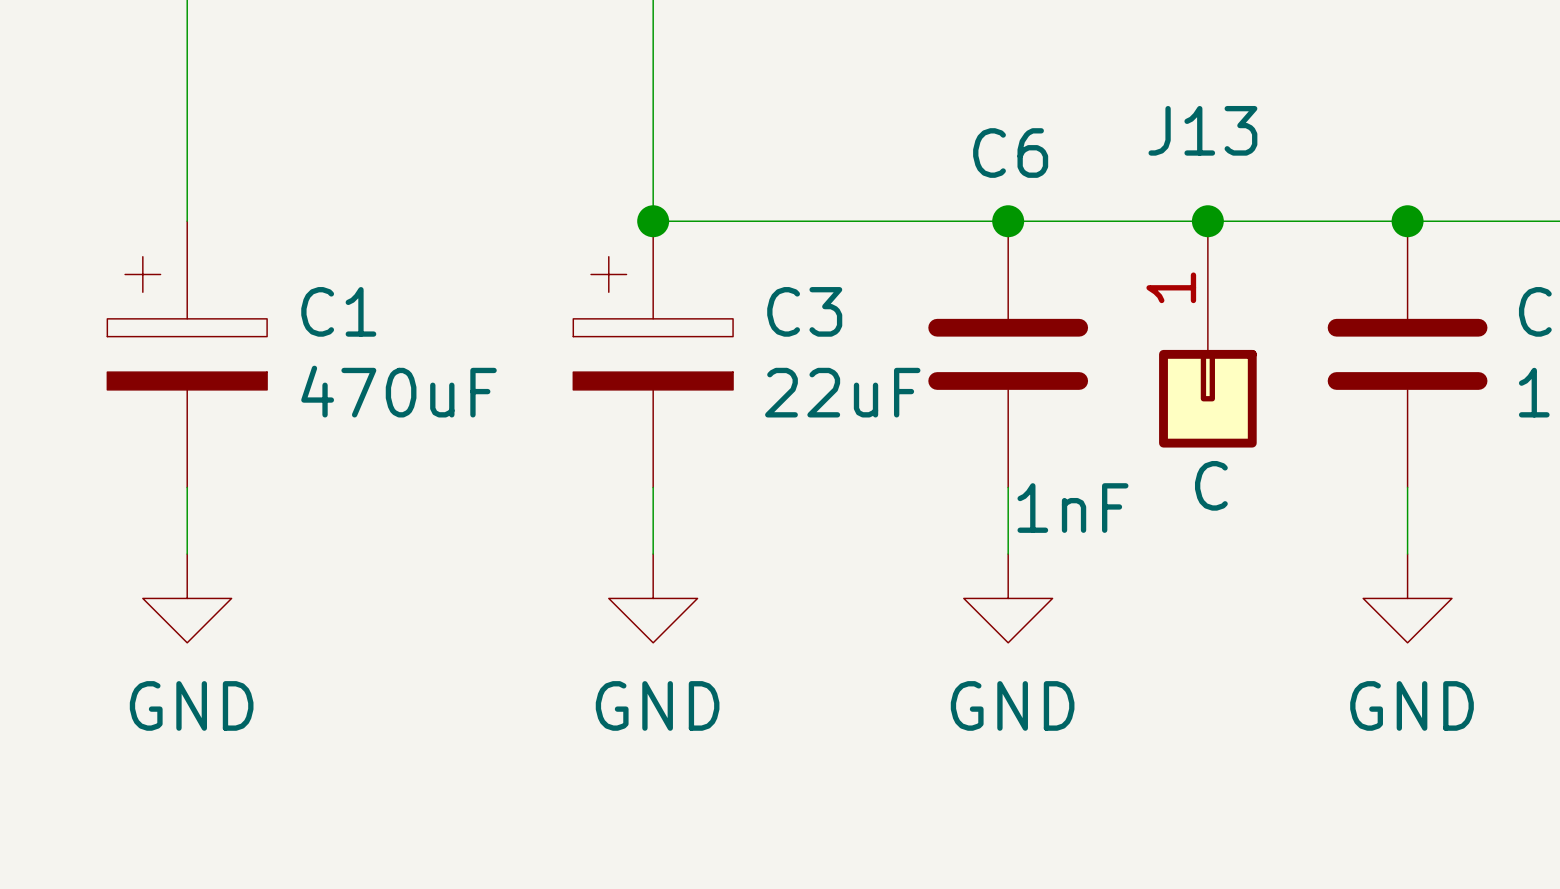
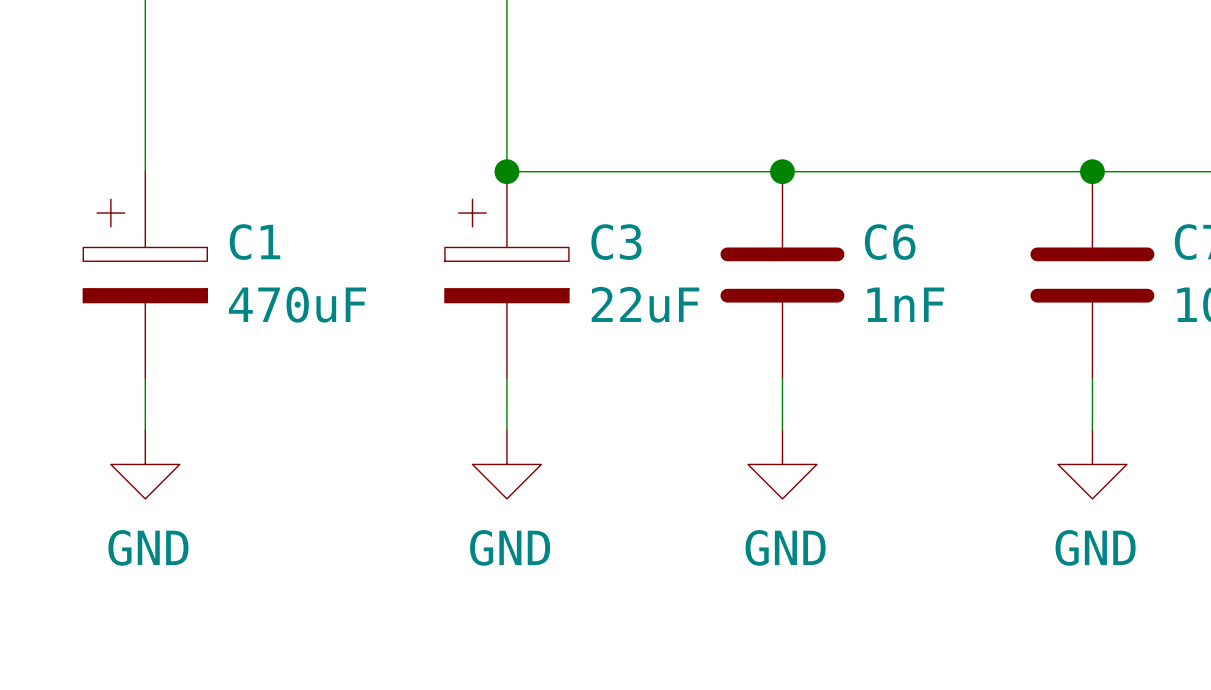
C6 name position: C6 (1010, 153) -> C6 (890, 242)
junction: (1207, 221) -> none
J13: C (1207, 334) -> none
C6 value position: 1nF (1072, 508) -> 1nF (905, 304)

